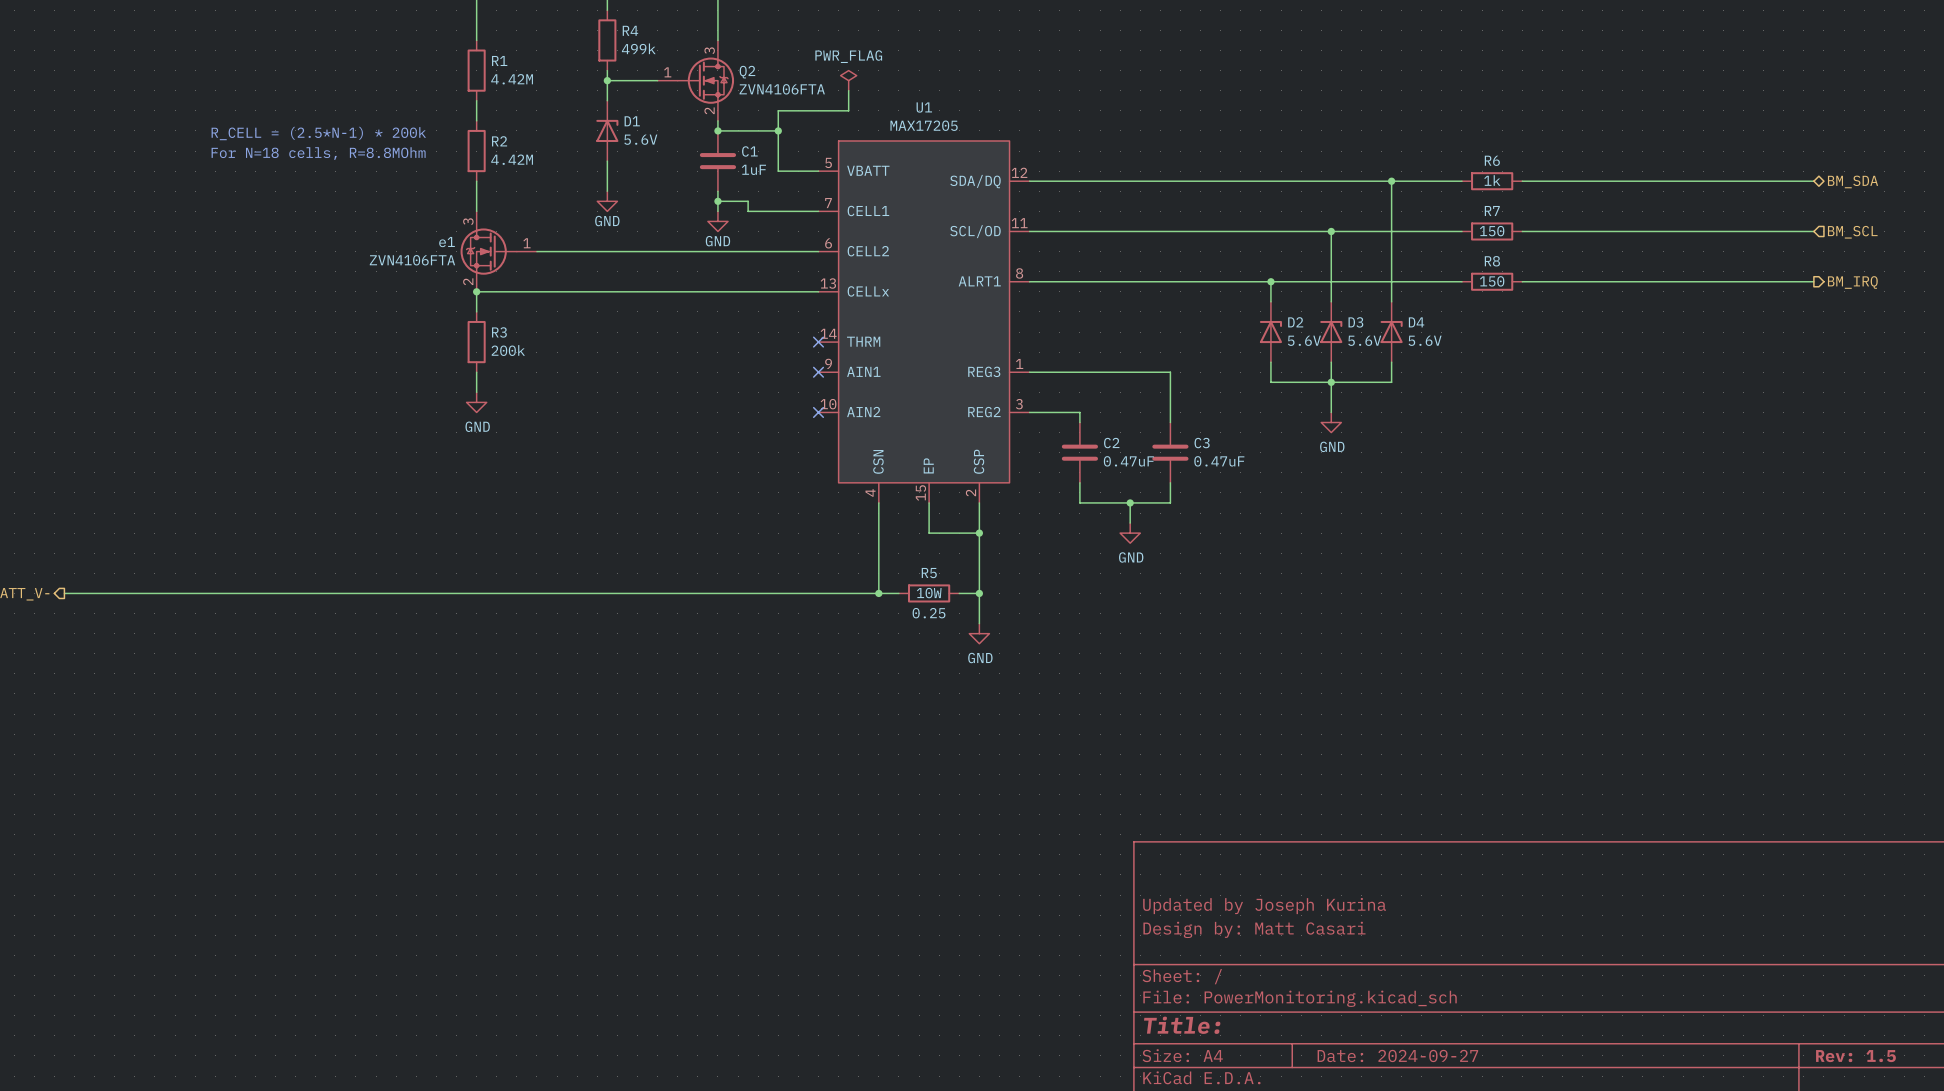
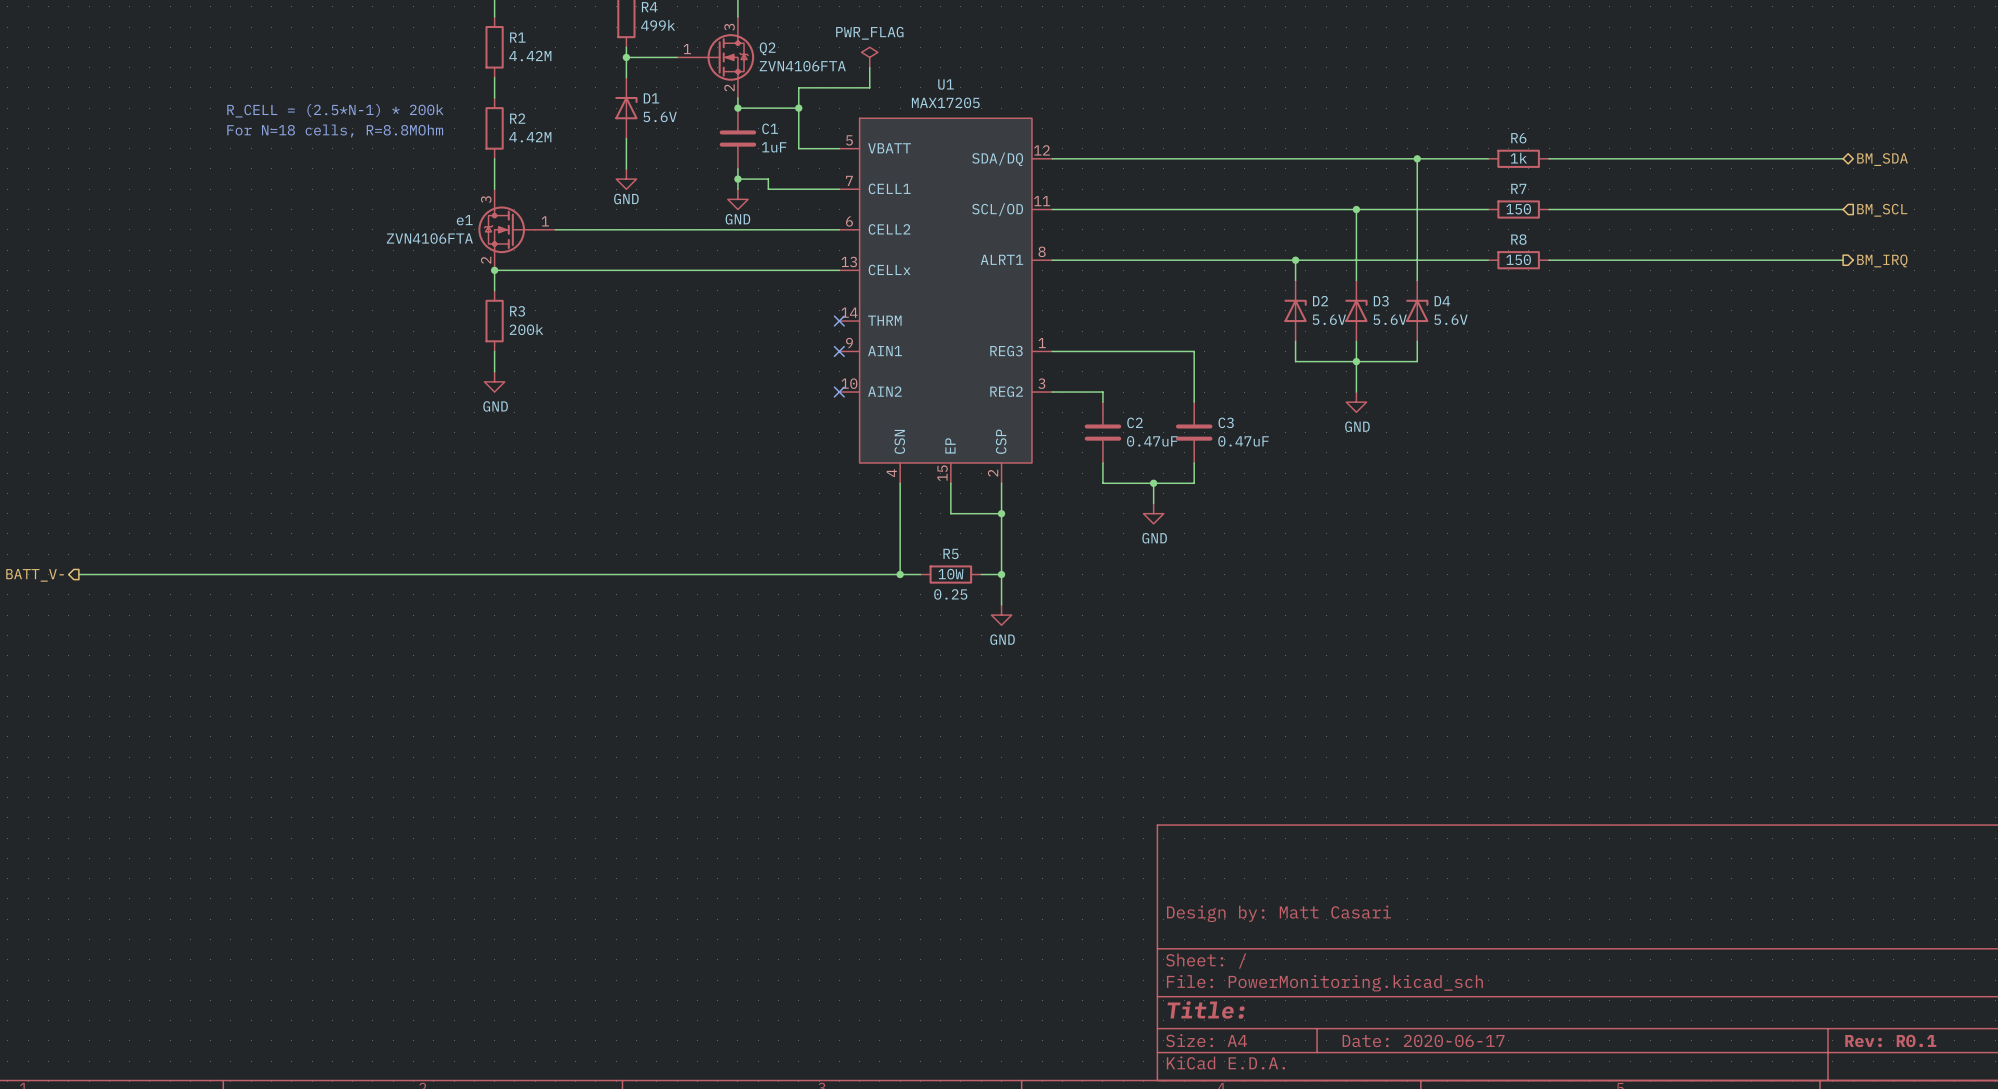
title block: Updated by Joseph Kurina (1264, 906) -> none
title block: Date: 2024-09-27 (1397, 1055) -> Date: 2020-06-17 (1423, 1040)
title block: Rev: 1.5 (1855, 1056) -> Rev: R0.1 (1890, 1040)

